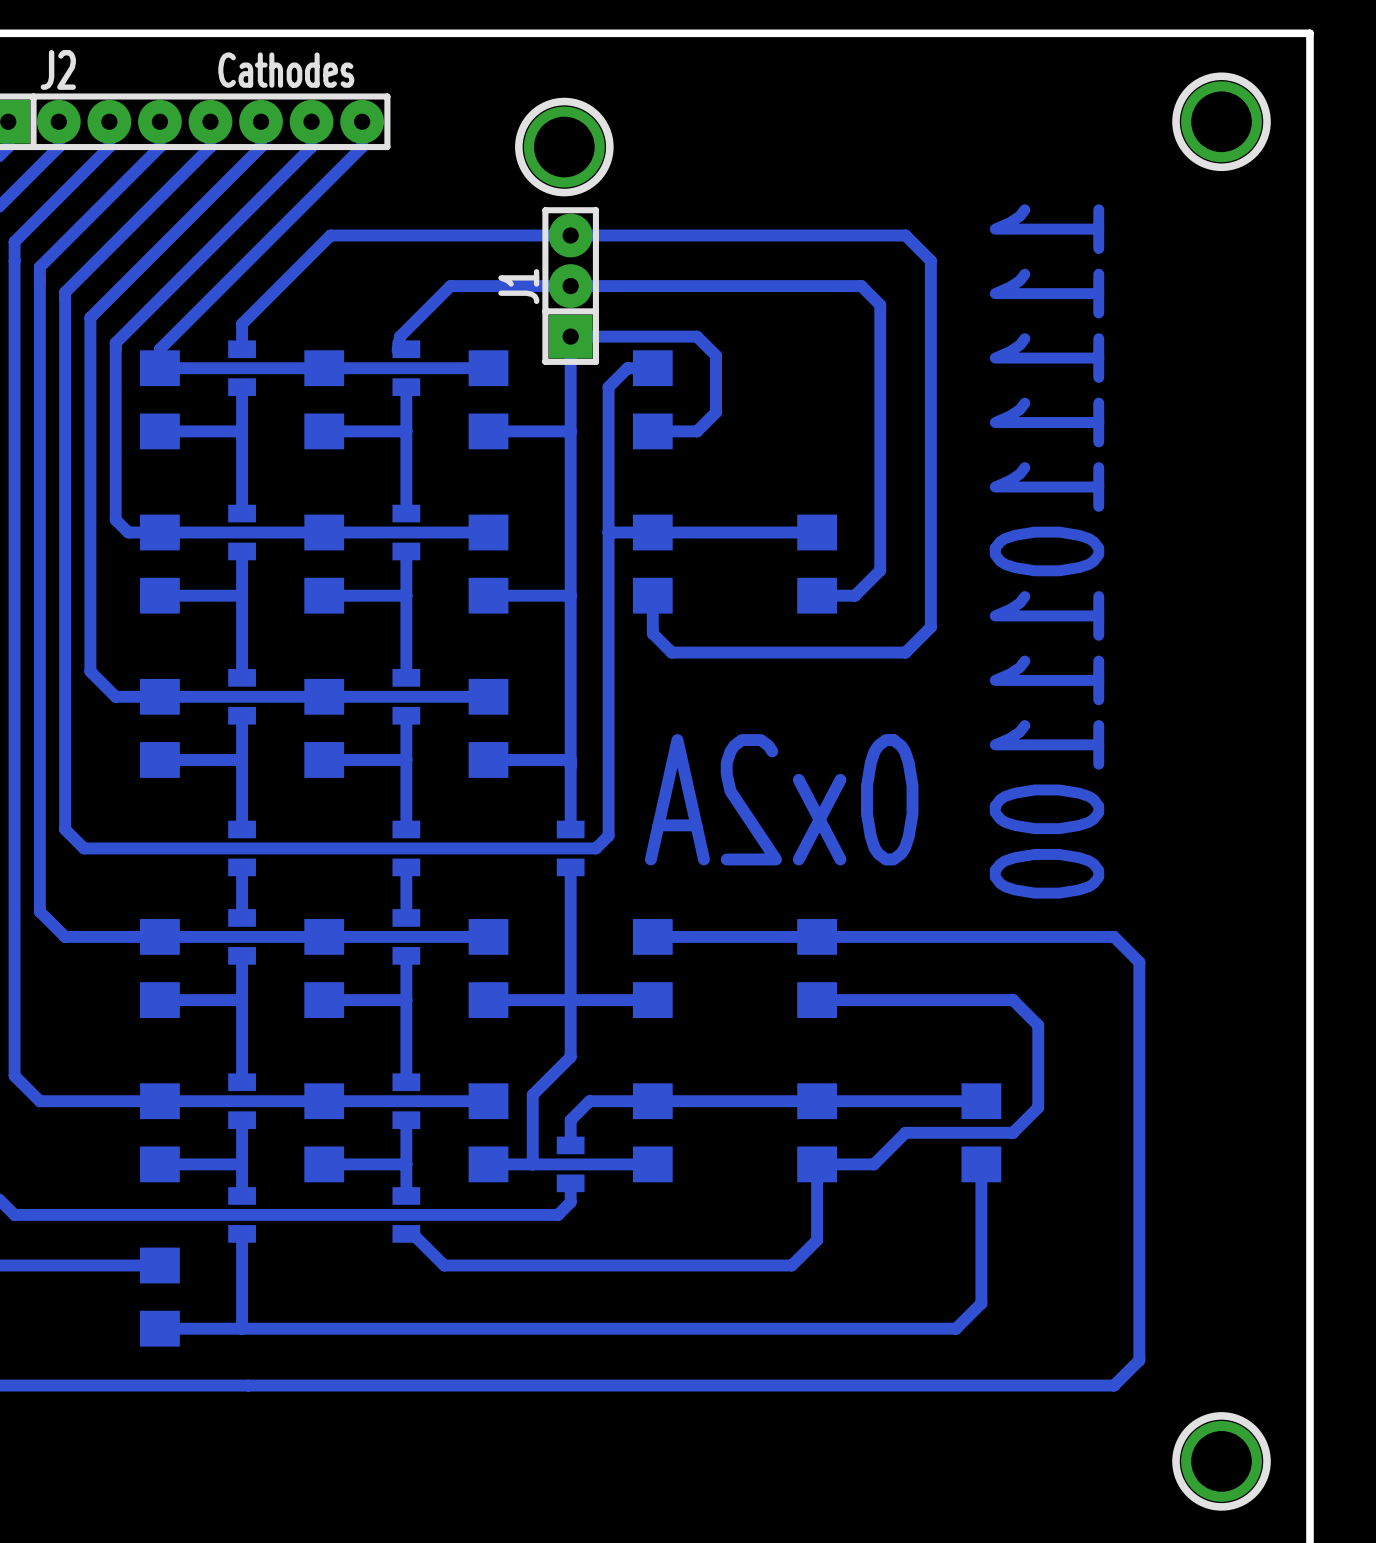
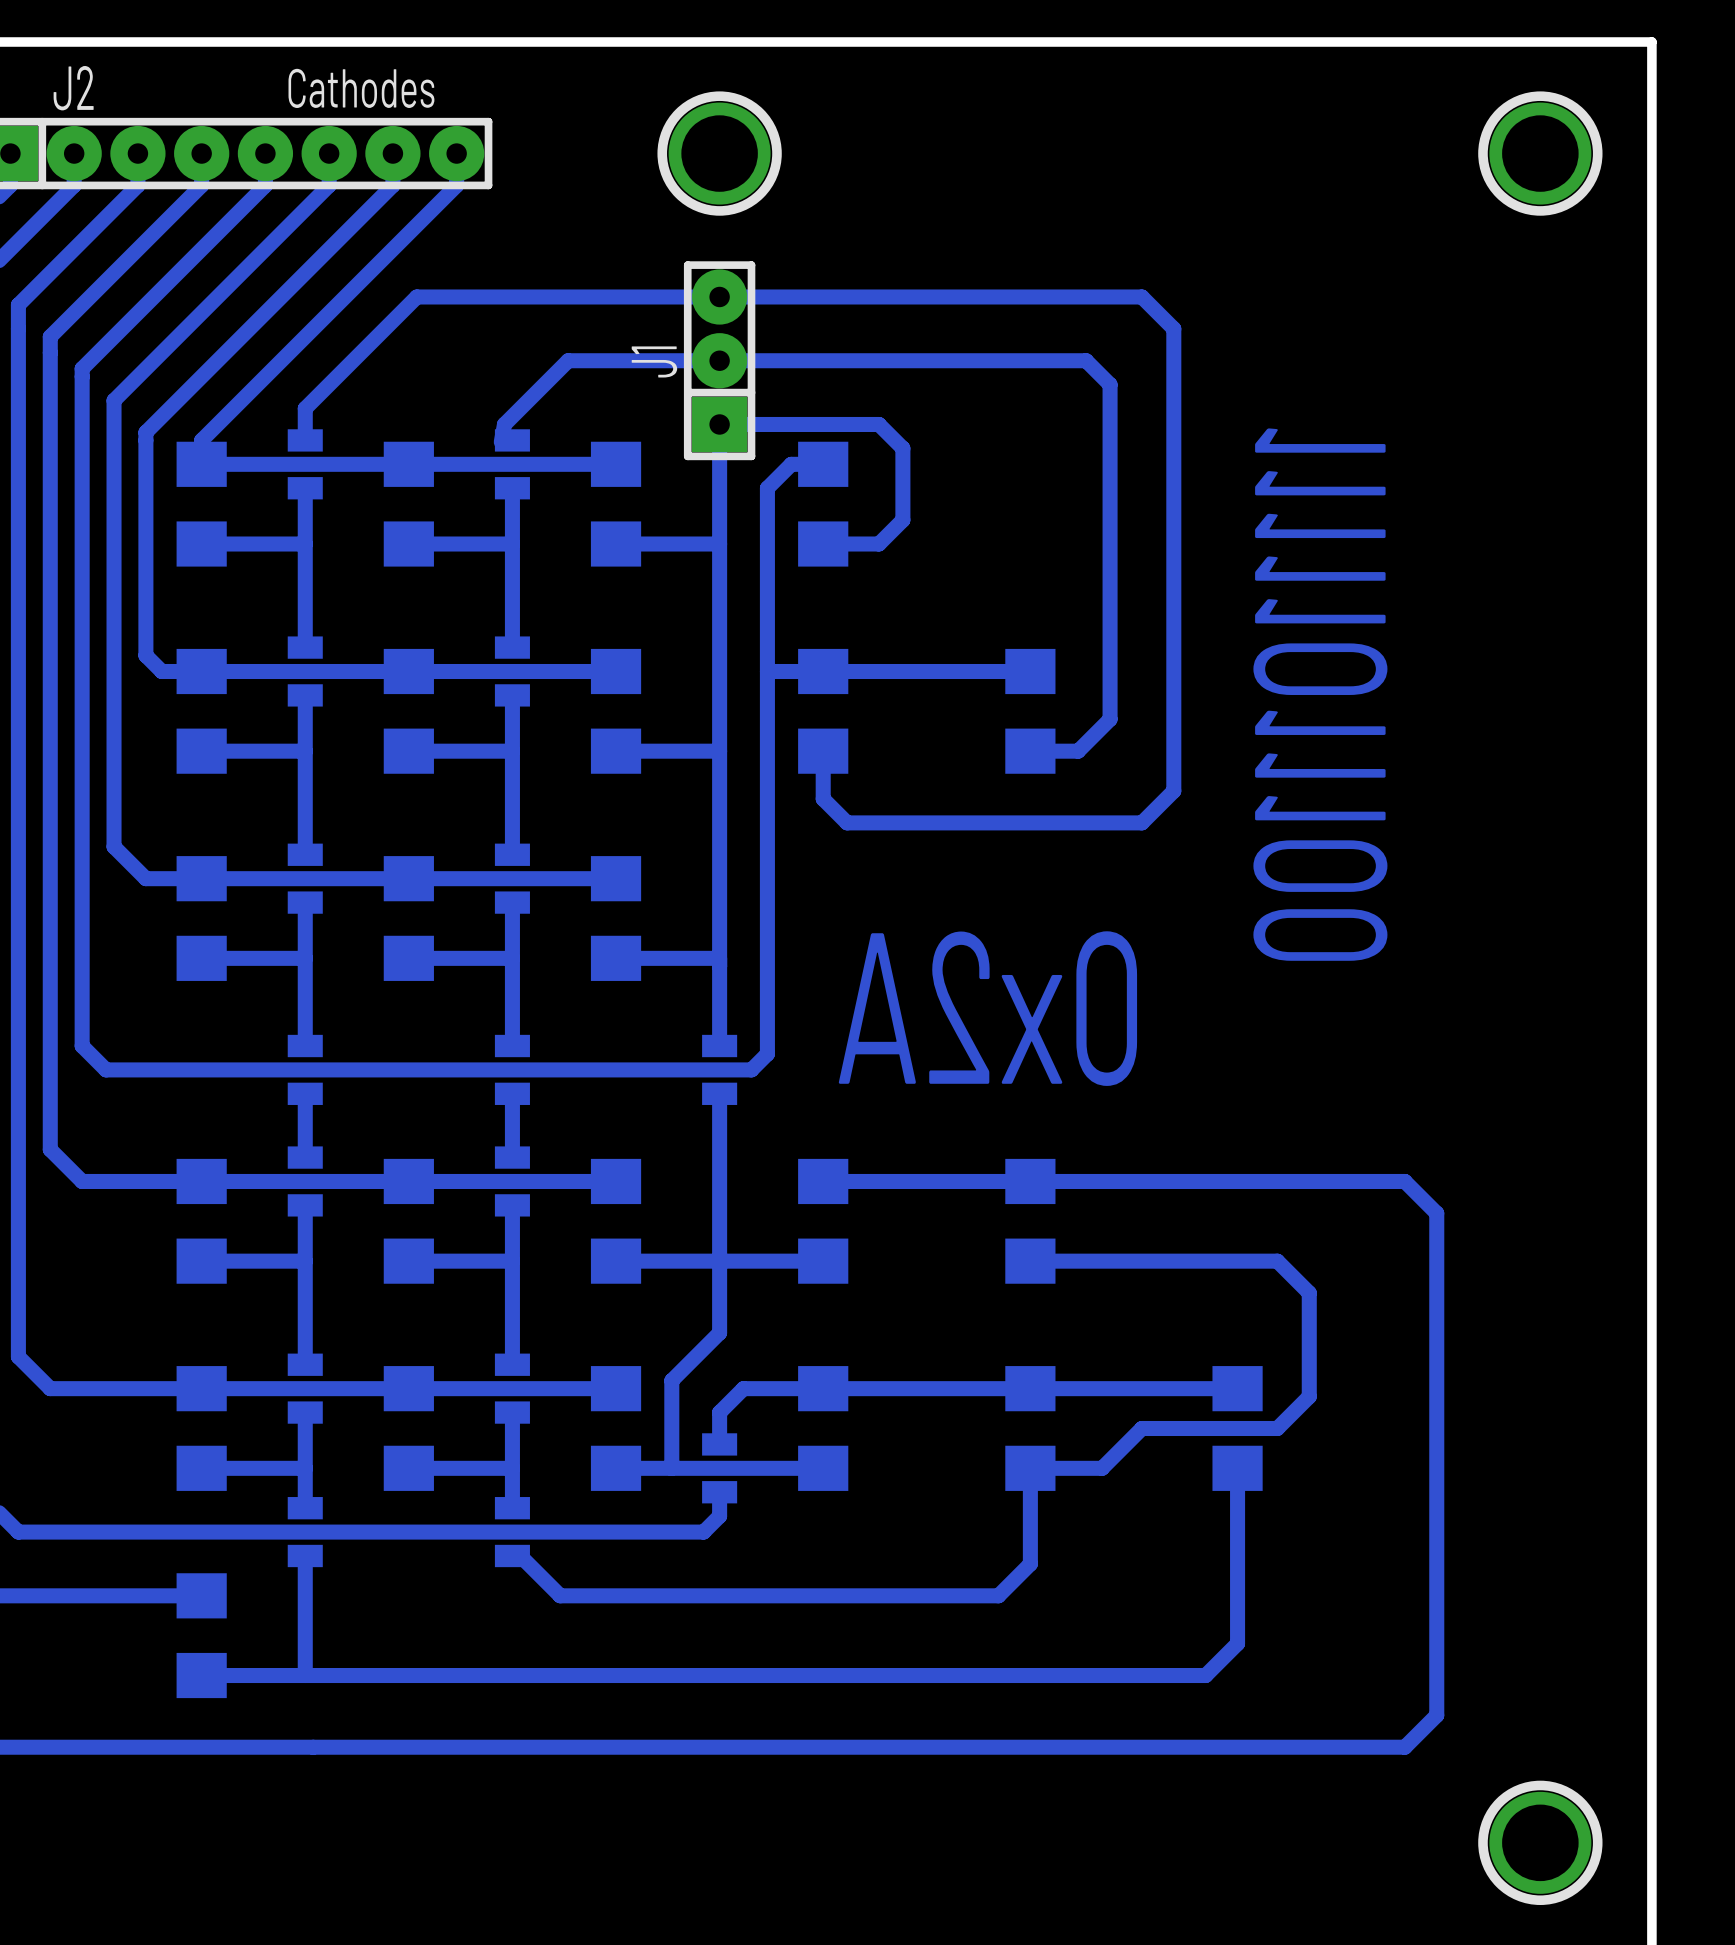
part position: (564, 147) -> (719, 153)

